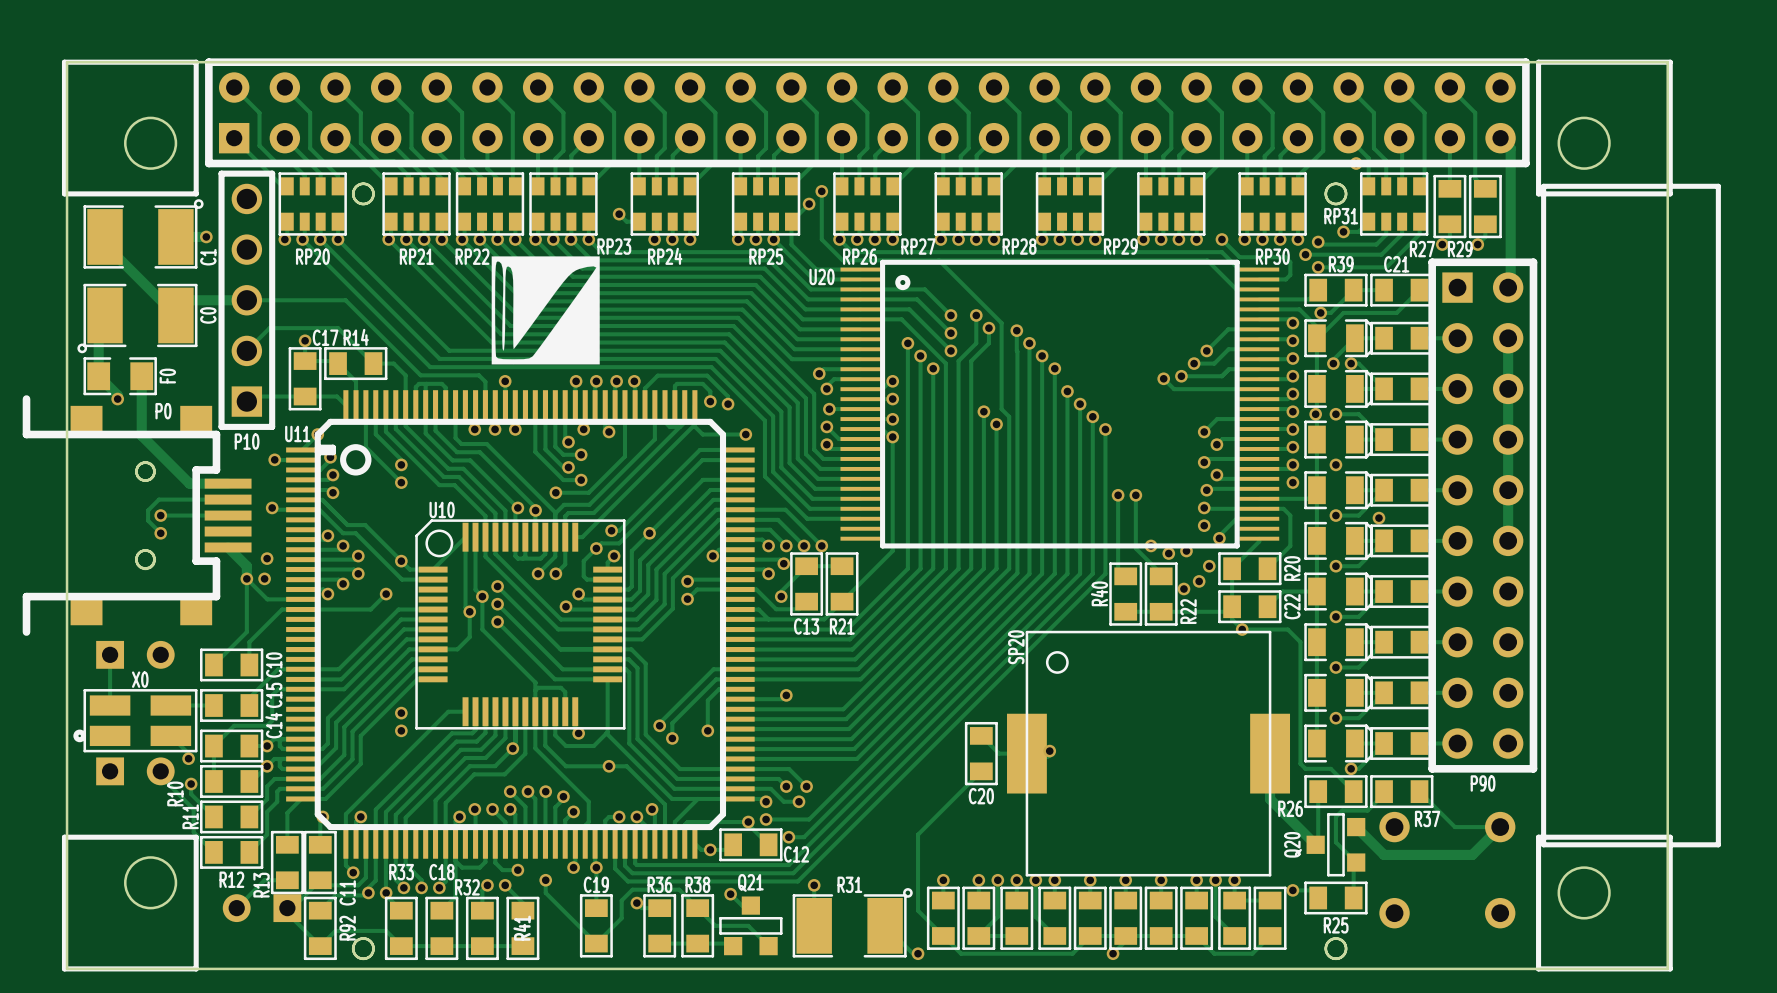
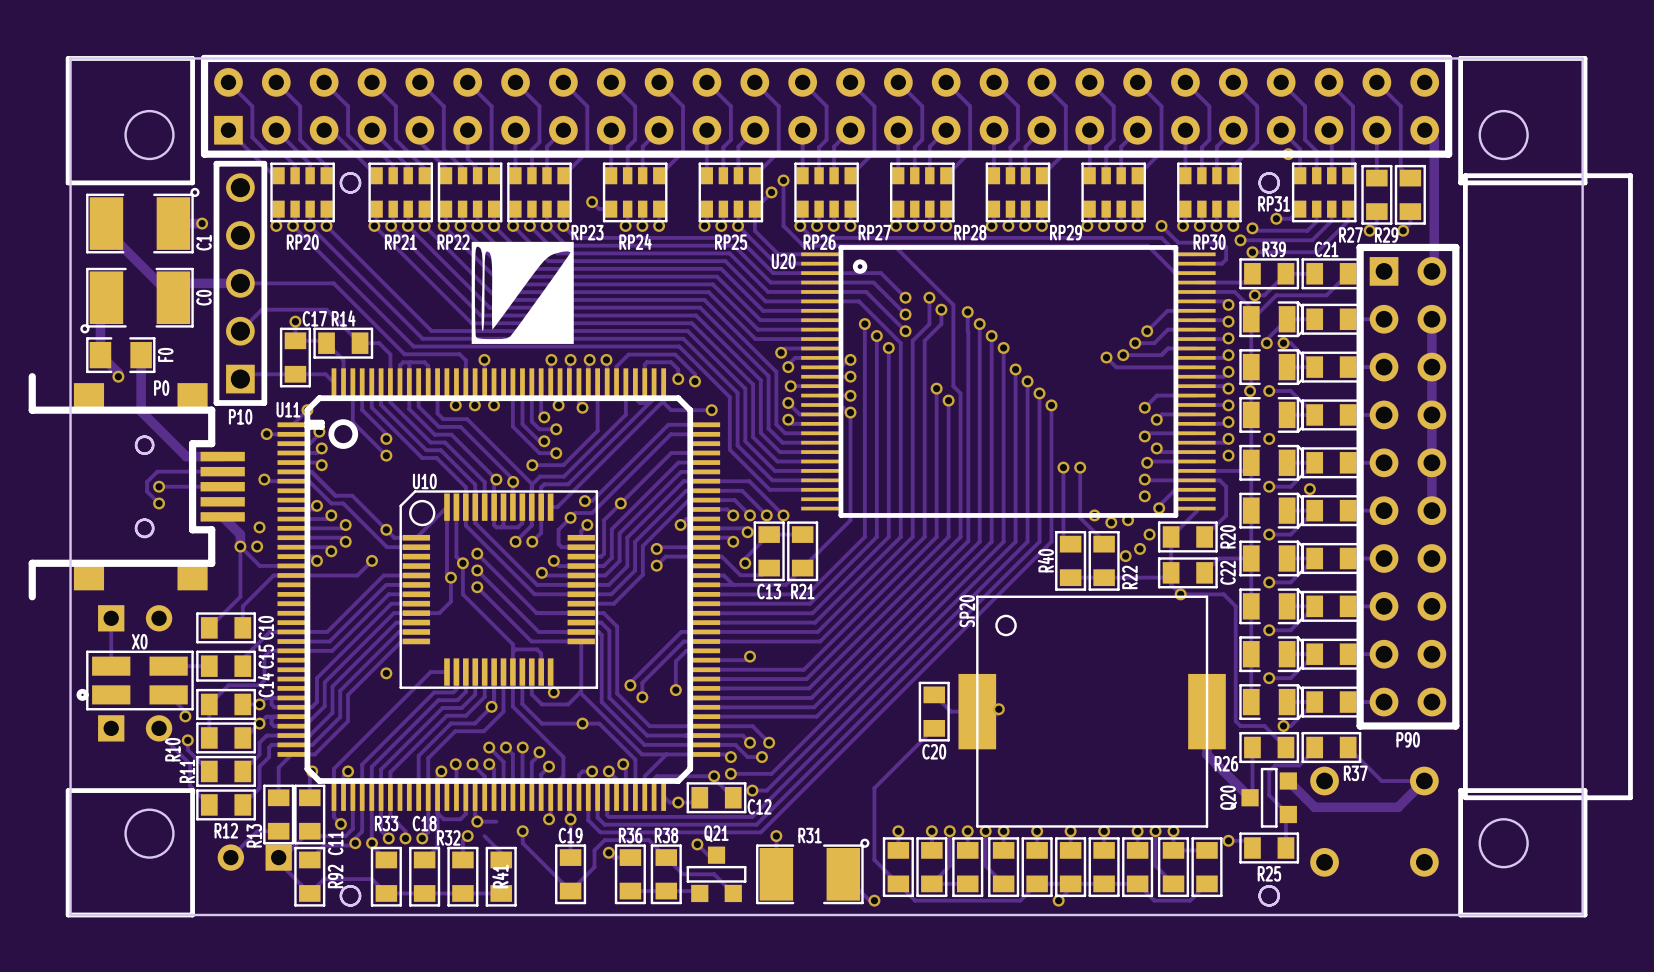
via: (401, 730) -> none
via: none -> (477, 821)
via: (517, 870) -> none
via: (505, 885) -> none

